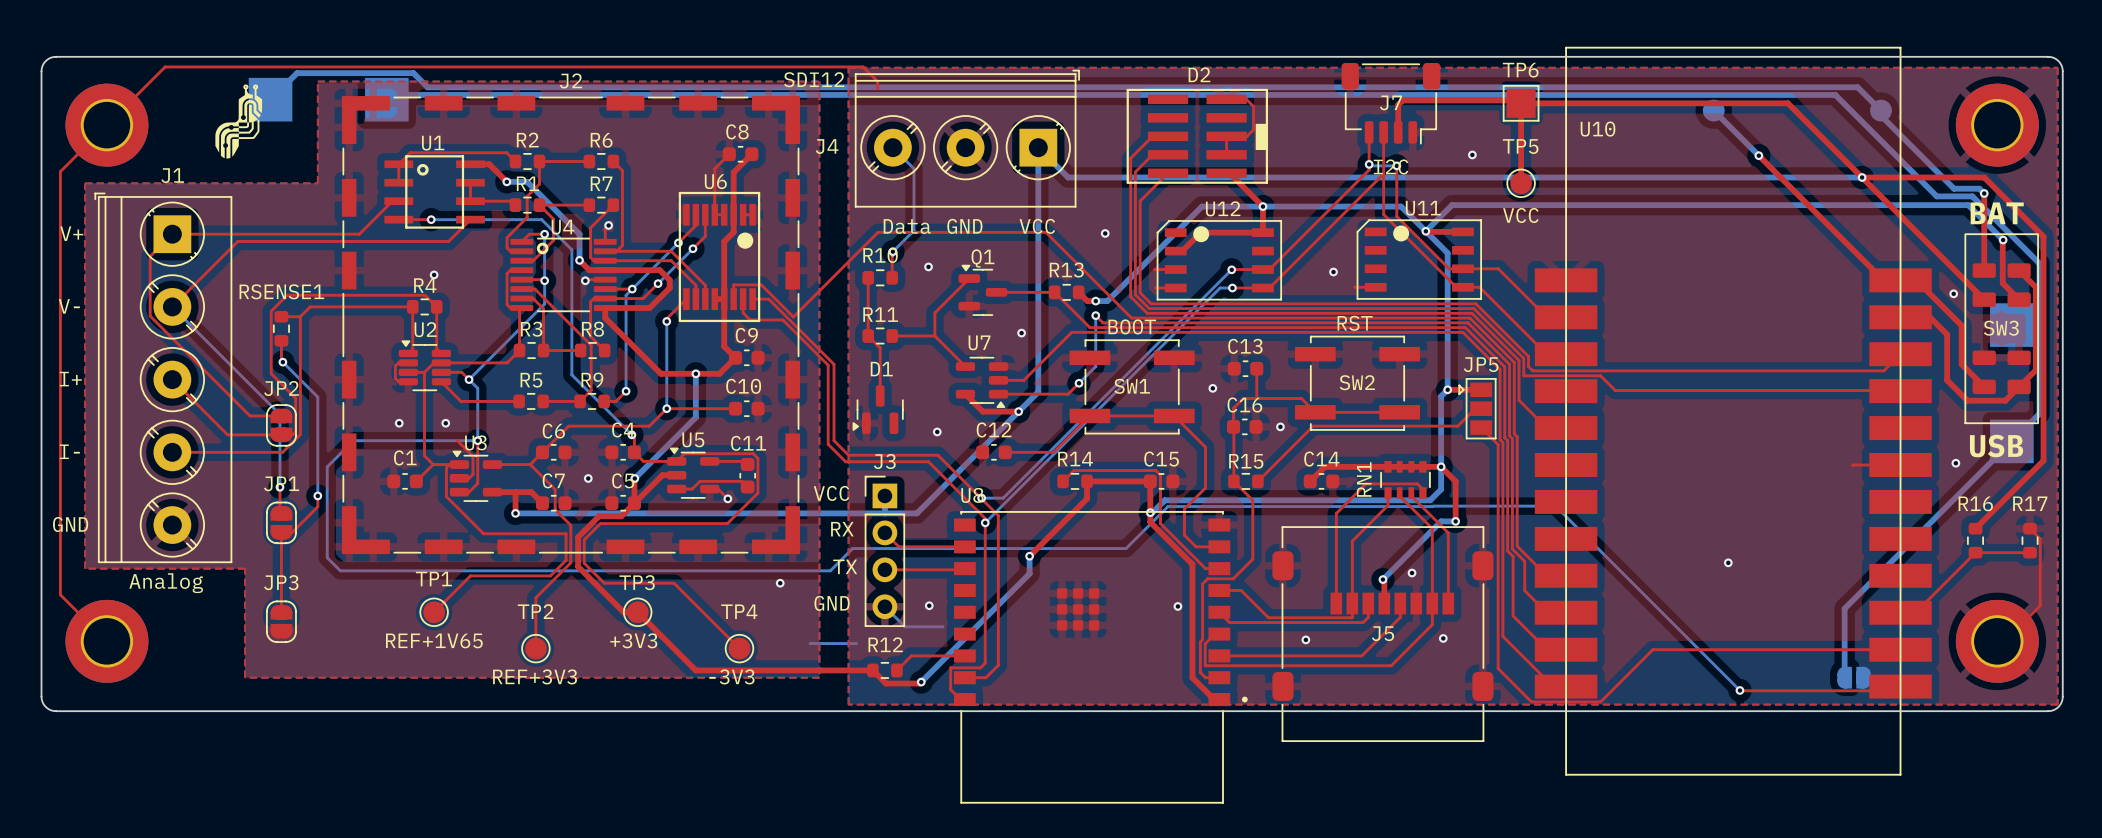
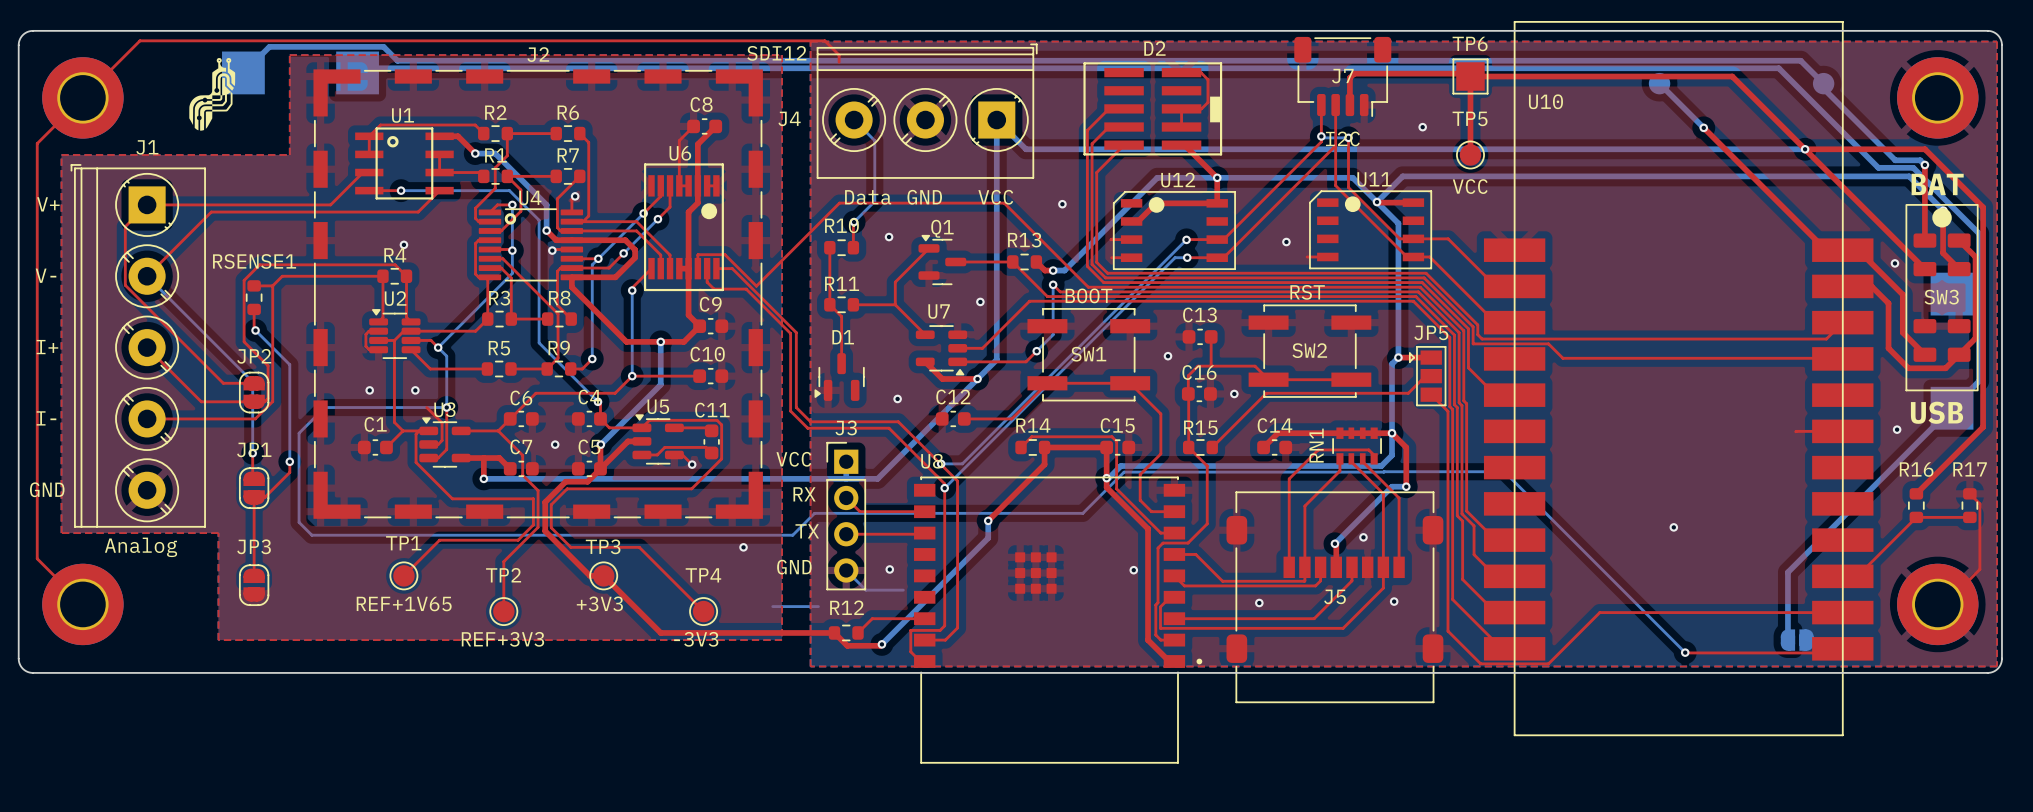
SW3 footprint: [1964, 233, 2039, 424] -> [1905, 204, 1979, 392]

